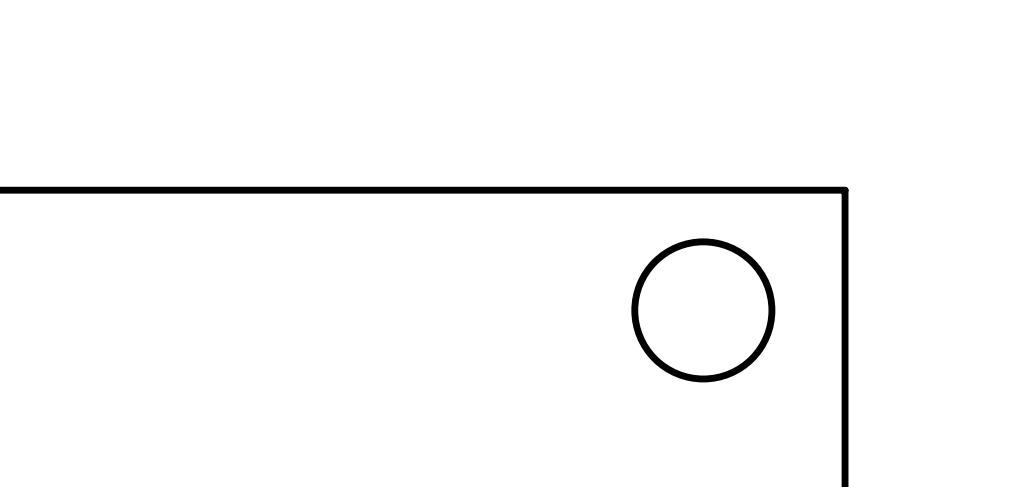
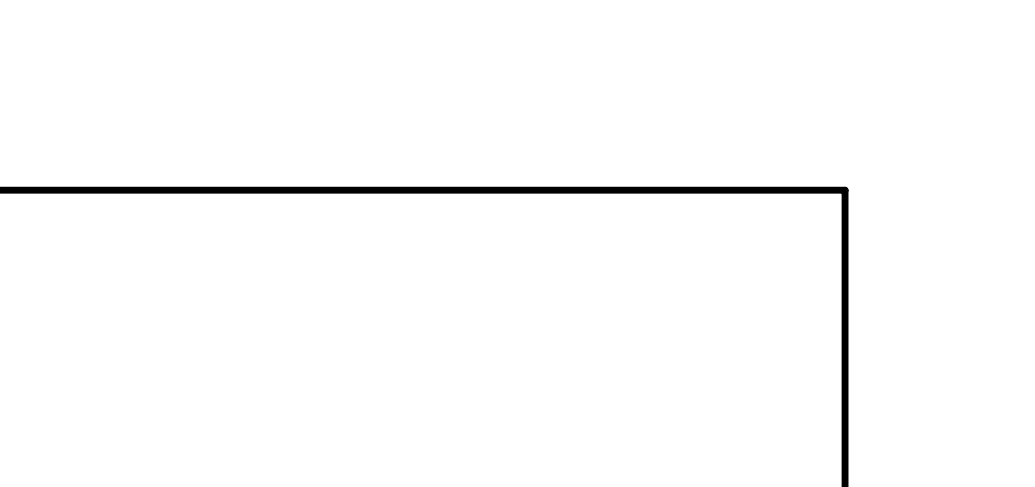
round board edge: [631, 238, 776, 383] -> none

